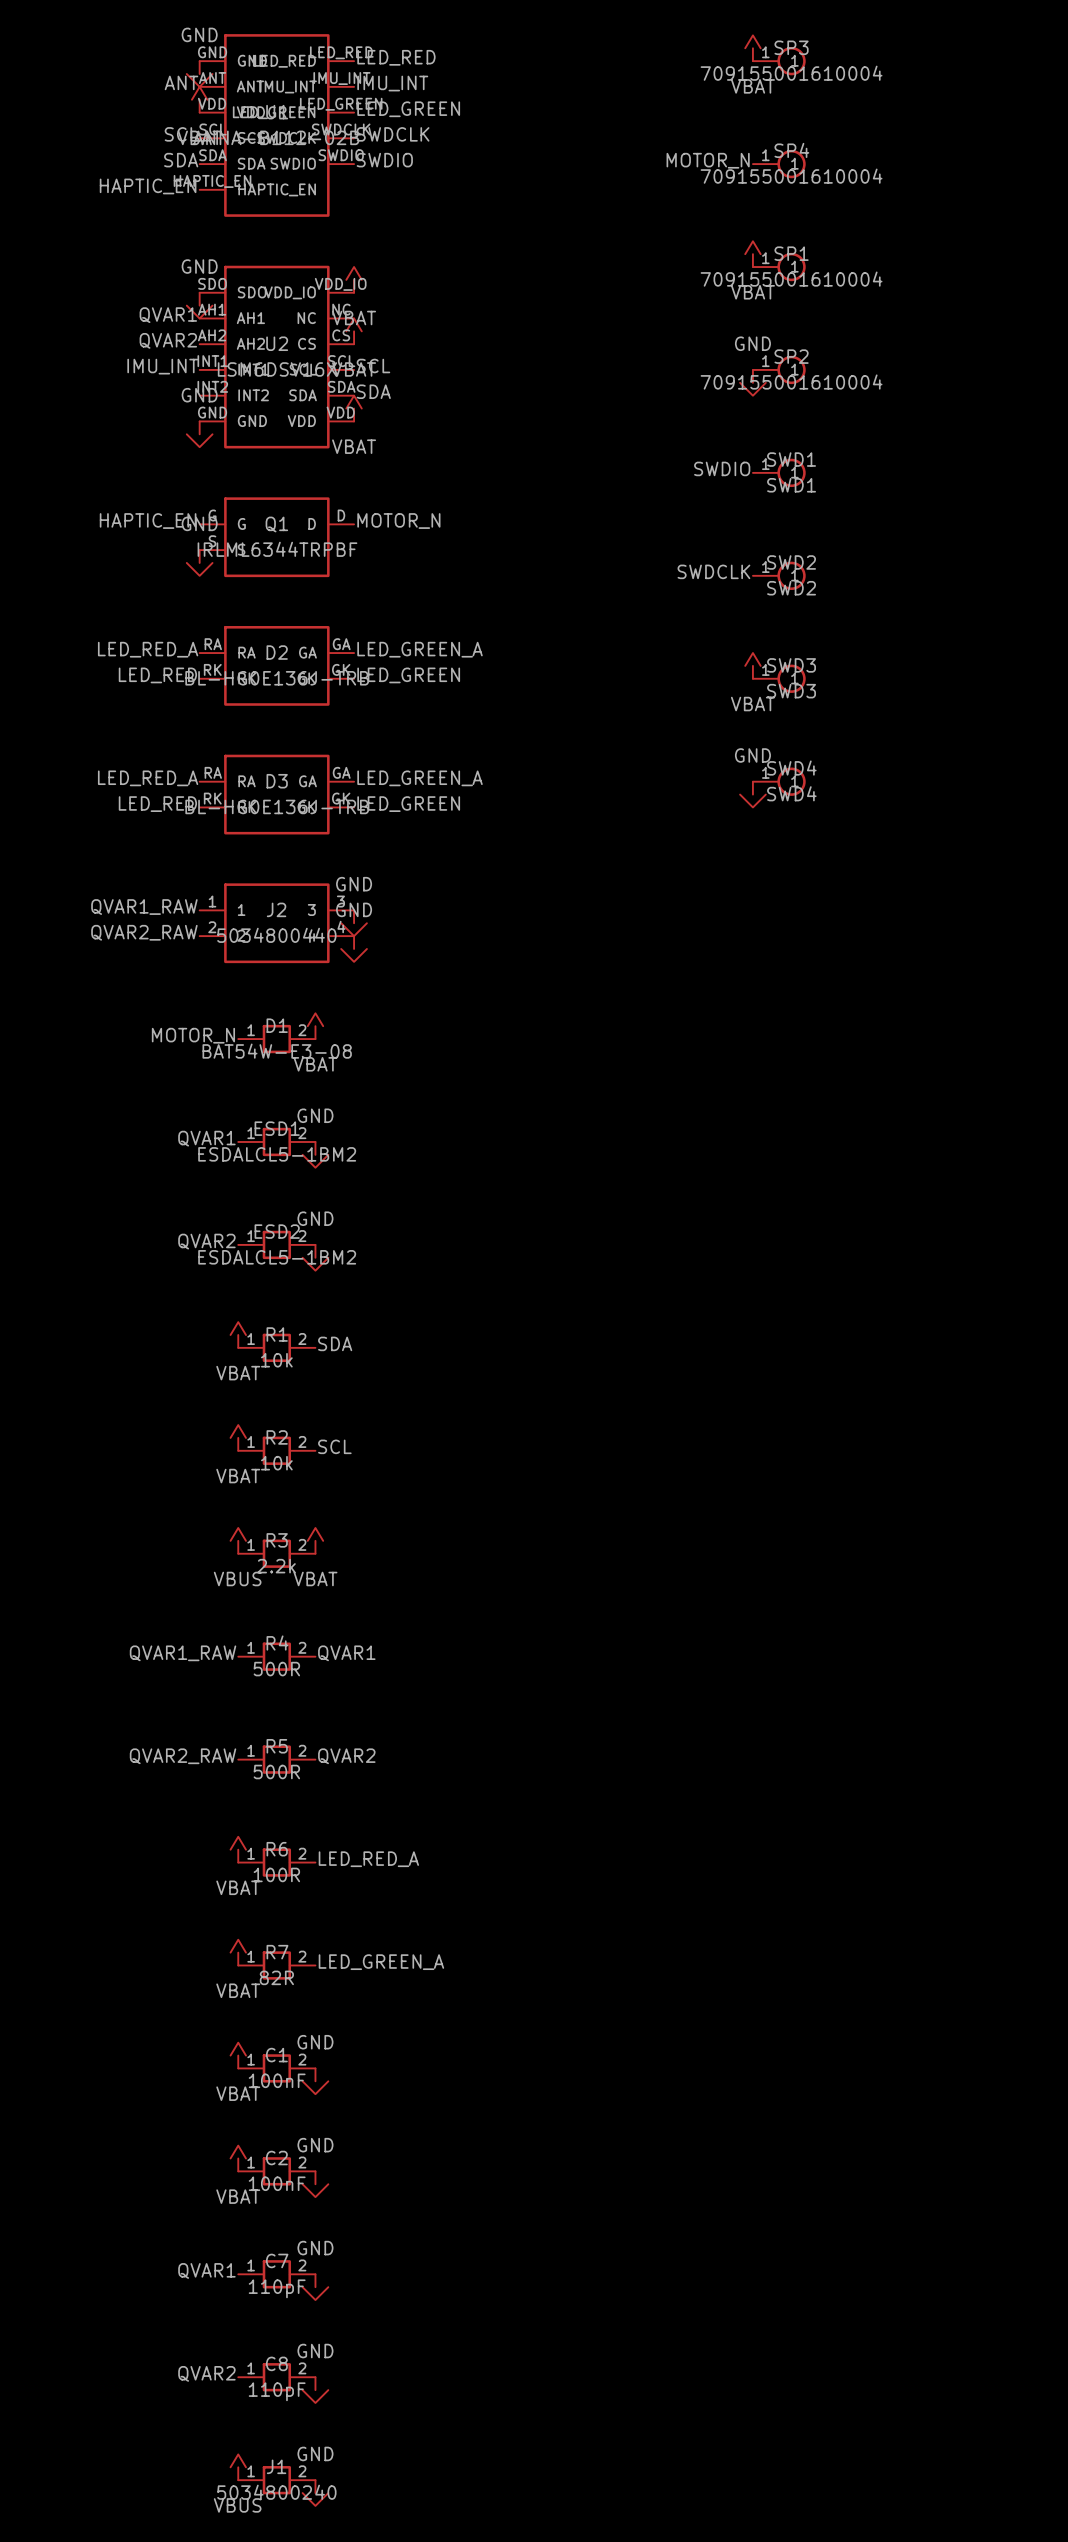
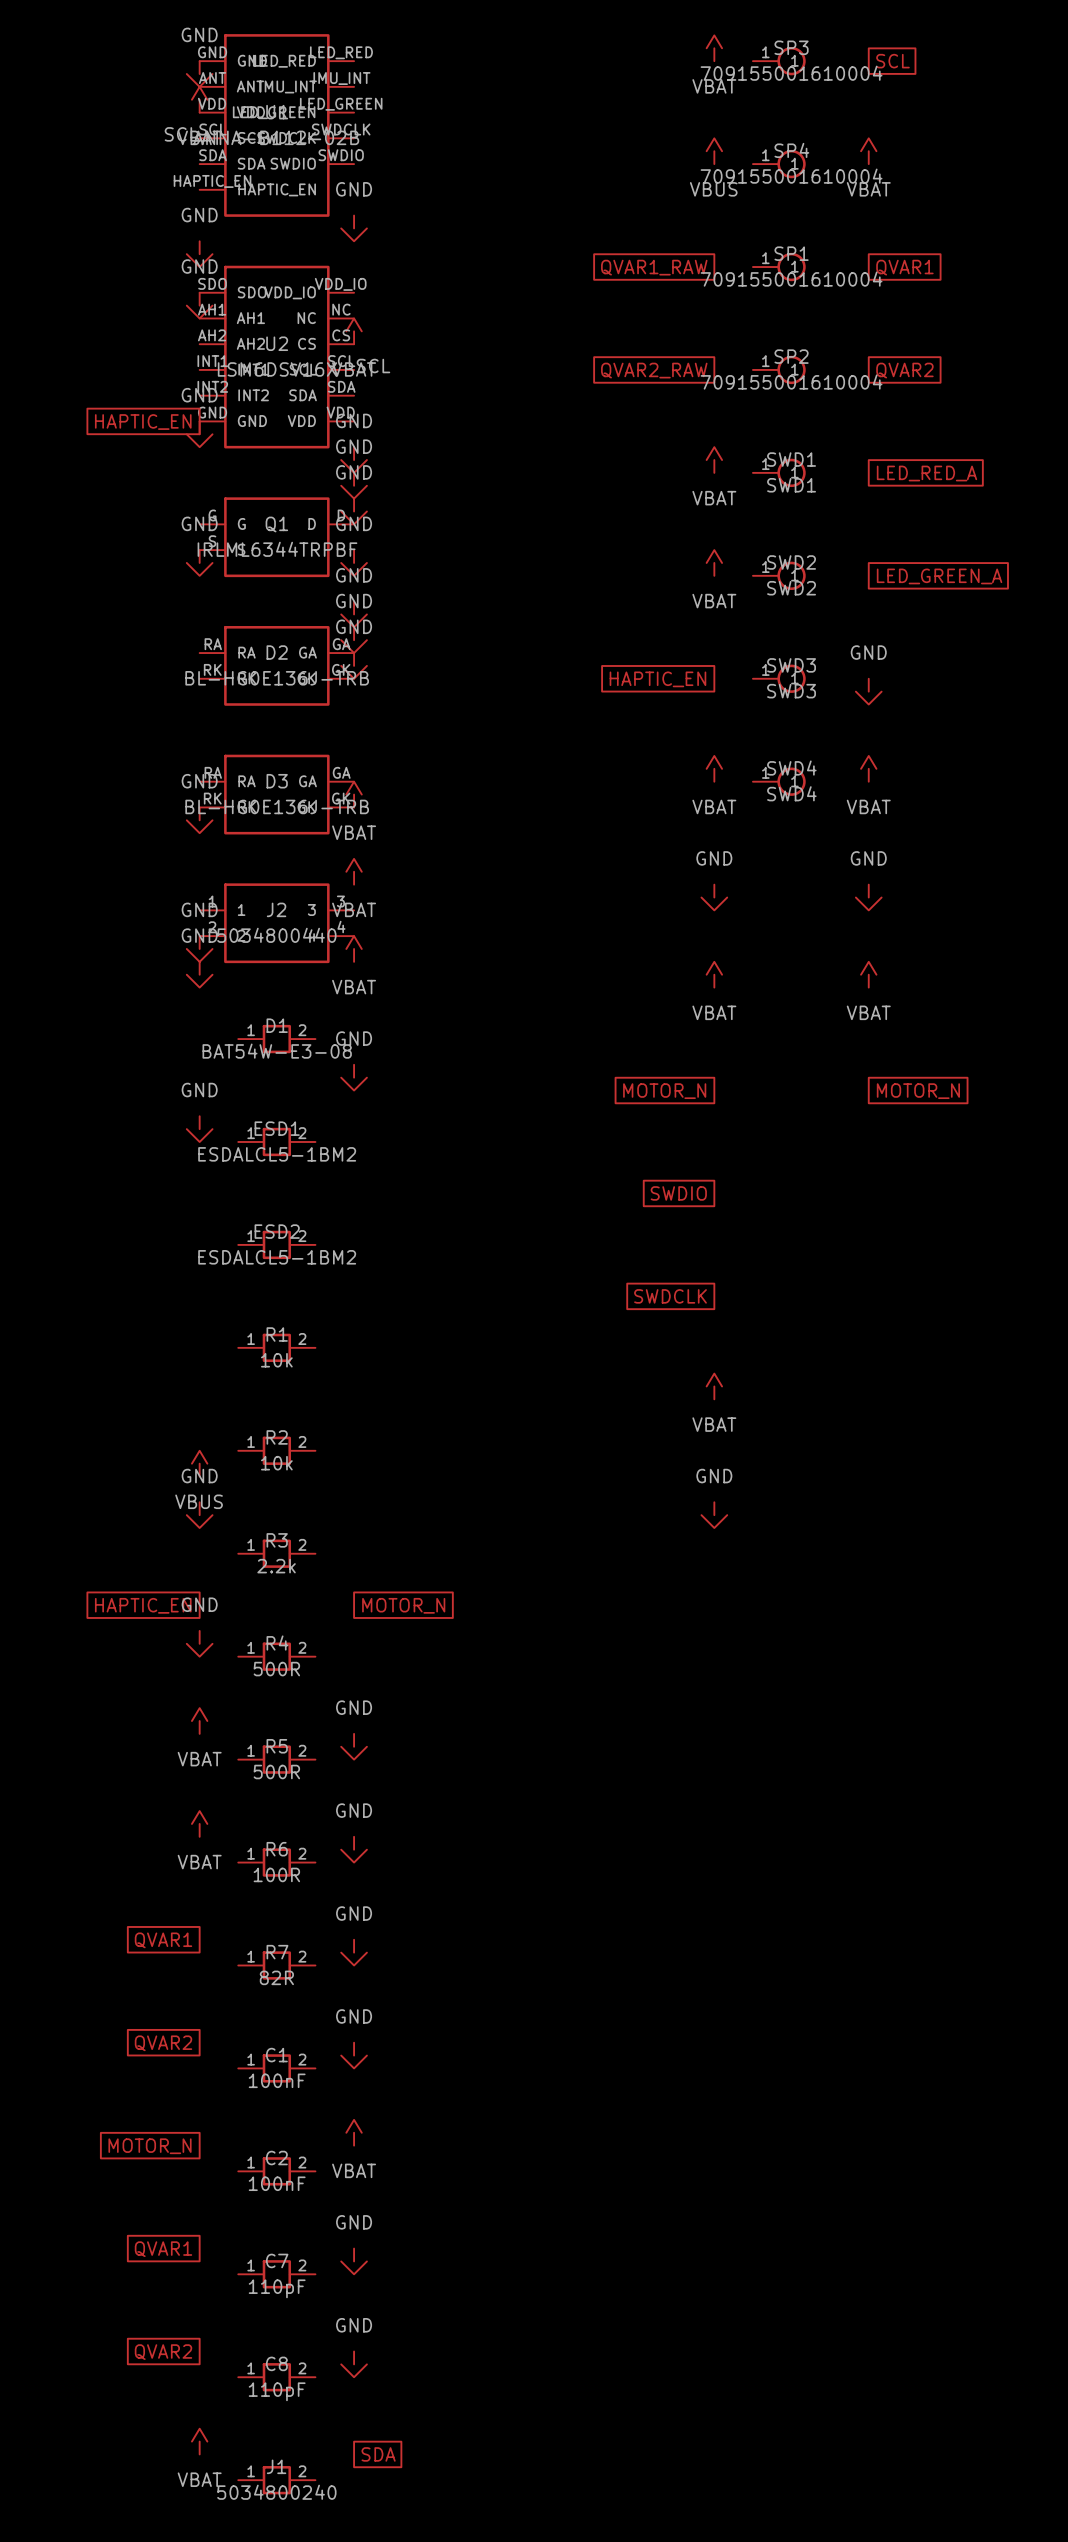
power symbol position: VBAT (752, 48) -> VBAT (714, 48)
label: LED_RED (396, 57) -> none
global label: none -> SCL (892, 61)
label: ANT (181, 82) -> none
label: IMU_INT (392, 83) -> none
label: LED_GREEN (408, 109) -> none
label: SWDCLK (393, 134) -> none
power symbol: none -> VBUS (714, 151)
power symbol: none -> VBAT (868, 151)
label: SDA (181, 160) -> none
label: SWDIO (384, 160) -> none
label: MOTOR_N (708, 160) -> none
label: HAPTIC_EN (148, 186) -> none
power symbol: none -> GND (354, 228)
power symbol: none -> GND (199, 254)
power symbol: VBAT (752, 254) -> none
global label: none -> QVAR1_RAW (654, 267)
global label: none -> QVAR1 (904, 267)
power symbol: VBAT (354, 279) -> none
label: QVAR1 (168, 315) -> none
label: QVAR2 (168, 340) -> none
label: IMU_INT (162, 366) -> none
global label: none -> QVAR2_RAW (654, 370)
global label: none -> QVAR2 (904, 370)
power symbol: GND (752, 382) -> none
label: SDA (373, 391) -> none
power symbol: VBAT (354, 408) -> none
global label: none -> HAPTIC_EN (143, 422)
power symbol: none -> GND (354, 460)
power symbol: none -> VBAT (714, 460)
label: SWDIO (722, 468) -> none
global label: none -> LED_RED_A (926, 473)
power symbol: none -> GND (354, 485)
power symbol: none -> GND (354, 511)
label: HAPTIC_EN (148, 521) -> none
label: MOTOR_N (398, 521) -> none
power symbol: none -> GND (354, 562)
power symbol: none -> VBAT (714, 562)
label: SWDCLK (713, 571) -> none
global label: none -> LED_GREEN_A (939, 576)
power symbol: none -> GND (354, 614)
power symbol: none -> GND (354, 640)
label: LED_RED_A (148, 649) -> none
label: LED_GREEN_A (420, 649) -> none
power symbol: none -> GND (354, 665)
power symbol: VBAT (752, 665) -> none
label: LED_RED (157, 675) -> none
label: LED_GREEN (408, 675) -> none
global label: none -> HAPTIC_EN (657, 679)
power symbol: none -> GND (868, 691)
power symbol: none -> VBAT (714, 768)
power symbol: none -> VBAT (868, 768)
label: LED_RED_A (148, 778) -> none
label: LED_GREEN_A (420, 778) -> none
power symbol: none -> VBAT (354, 794)
power symbol: GND (752, 794) -> none
label: LED_RED (157, 804) -> none
label: LED_GREEN (408, 804) -> none
power symbol: none -> GND (199, 820)
power symbol: none -> VBAT (354, 871)
power symbol: none -> GND (714, 897)
power symbol: none -> GND (868, 897)
label: QVAR1_RAW (144, 907) -> none
power symbol: GND (354, 923) -> none
label: QVAR2_RAW (144, 932) -> none
power symbol: none -> GND (199, 948)
power symbol: GND (354, 948) -> VBAT (354, 948)
power symbol: none -> GND (199, 974)
power symbol: none -> VBAT (714, 974)
power symbol: none -> VBAT (868, 974)
power symbol: VBAT (315, 1026) -> none
label: MOTOR_N (193, 1035) -> none
power symbol: none -> GND (354, 1077)
global label: none -> MOTOR_N (664, 1091)
global label: none -> MOTOR_N (918, 1091)
power symbol: none -> GND (199, 1129)
label: QVAR1 (206, 1138) -> none
power symbol: GND (315, 1154) -> none
global label: none -> SWDIO (678, 1193)
label: QVAR2 (206, 1241) -> none
power symbol: GND (315, 1257) -> none
global label: none -> SWDCLK (670, 1296)
power symbol: VBAT (238, 1334) -> none
label: SDA (335, 1343) -> none
power symbol: none -> VBAT (714, 1386)
power symbol: VBAT (238, 1437) -> none
label: SCL (334, 1446) -> none
power symbol: none -> GND (199, 1515)
power symbol: none -> GND (714, 1515)
power symbol position: VBUS (238, 1540) -> VBUS (199, 1463)
power symbol: VBAT (315, 1540) -> none
global label: none -> HAPTIC_EN (143, 1605)
global label: none -> MOTOR_N (403, 1605)
power symbol: none -> GND (199, 1643)
label: QVAR1_RAW (183, 1653) -> none
label: QVAR1 (346, 1653) -> none
power symbol: none -> VBAT (199, 1721)
power symbol: none -> GND (354, 1746)
label: QVAR2_RAW (183, 1756) -> none
label: QVAR2 (346, 1756) -> none
power symbol position: VBAT (238, 1849) -> VBAT (199, 1823)
power symbol: none -> GND (354, 1849)
label: LED_RED_A (368, 1859) -> none
global label: none -> QVAR1 (163, 1940)
power symbol: VBAT (238, 1952) -> none
power symbol: none -> GND (354, 1952)
label: LED_GREEN_A (381, 1962) -> none
global label: none -> QVAR2 (163, 2043)
power symbol: VBAT (238, 2055) -> none
power symbol position: GND (315, 2081) -> GND (354, 2055)
power symbol: none -> VBAT (354, 2132)
global label: none -> MOTOR_N (150, 2146)
power symbol: VBAT (238, 2158) -> none
power symbol: GND (315, 2184) -> none
global label: none -> QVAR1 (163, 2249)
power symbol: none -> GND (354, 2261)
label: QVAR1 (206, 2270) -> none
power symbol: GND (315, 2287) -> none
global label: none -> QVAR2 (163, 2352)
power symbol: none -> GND (354, 2364)
label: QVAR2 (206, 2373) -> none
power symbol: GND (315, 2390) -> none
power symbol: none -> VBAT (199, 2441)
global label: none -> SDA (378, 2454)
power symbol: VBUS (238, 2467) -> none
power symbol: GND (315, 2493) -> none

